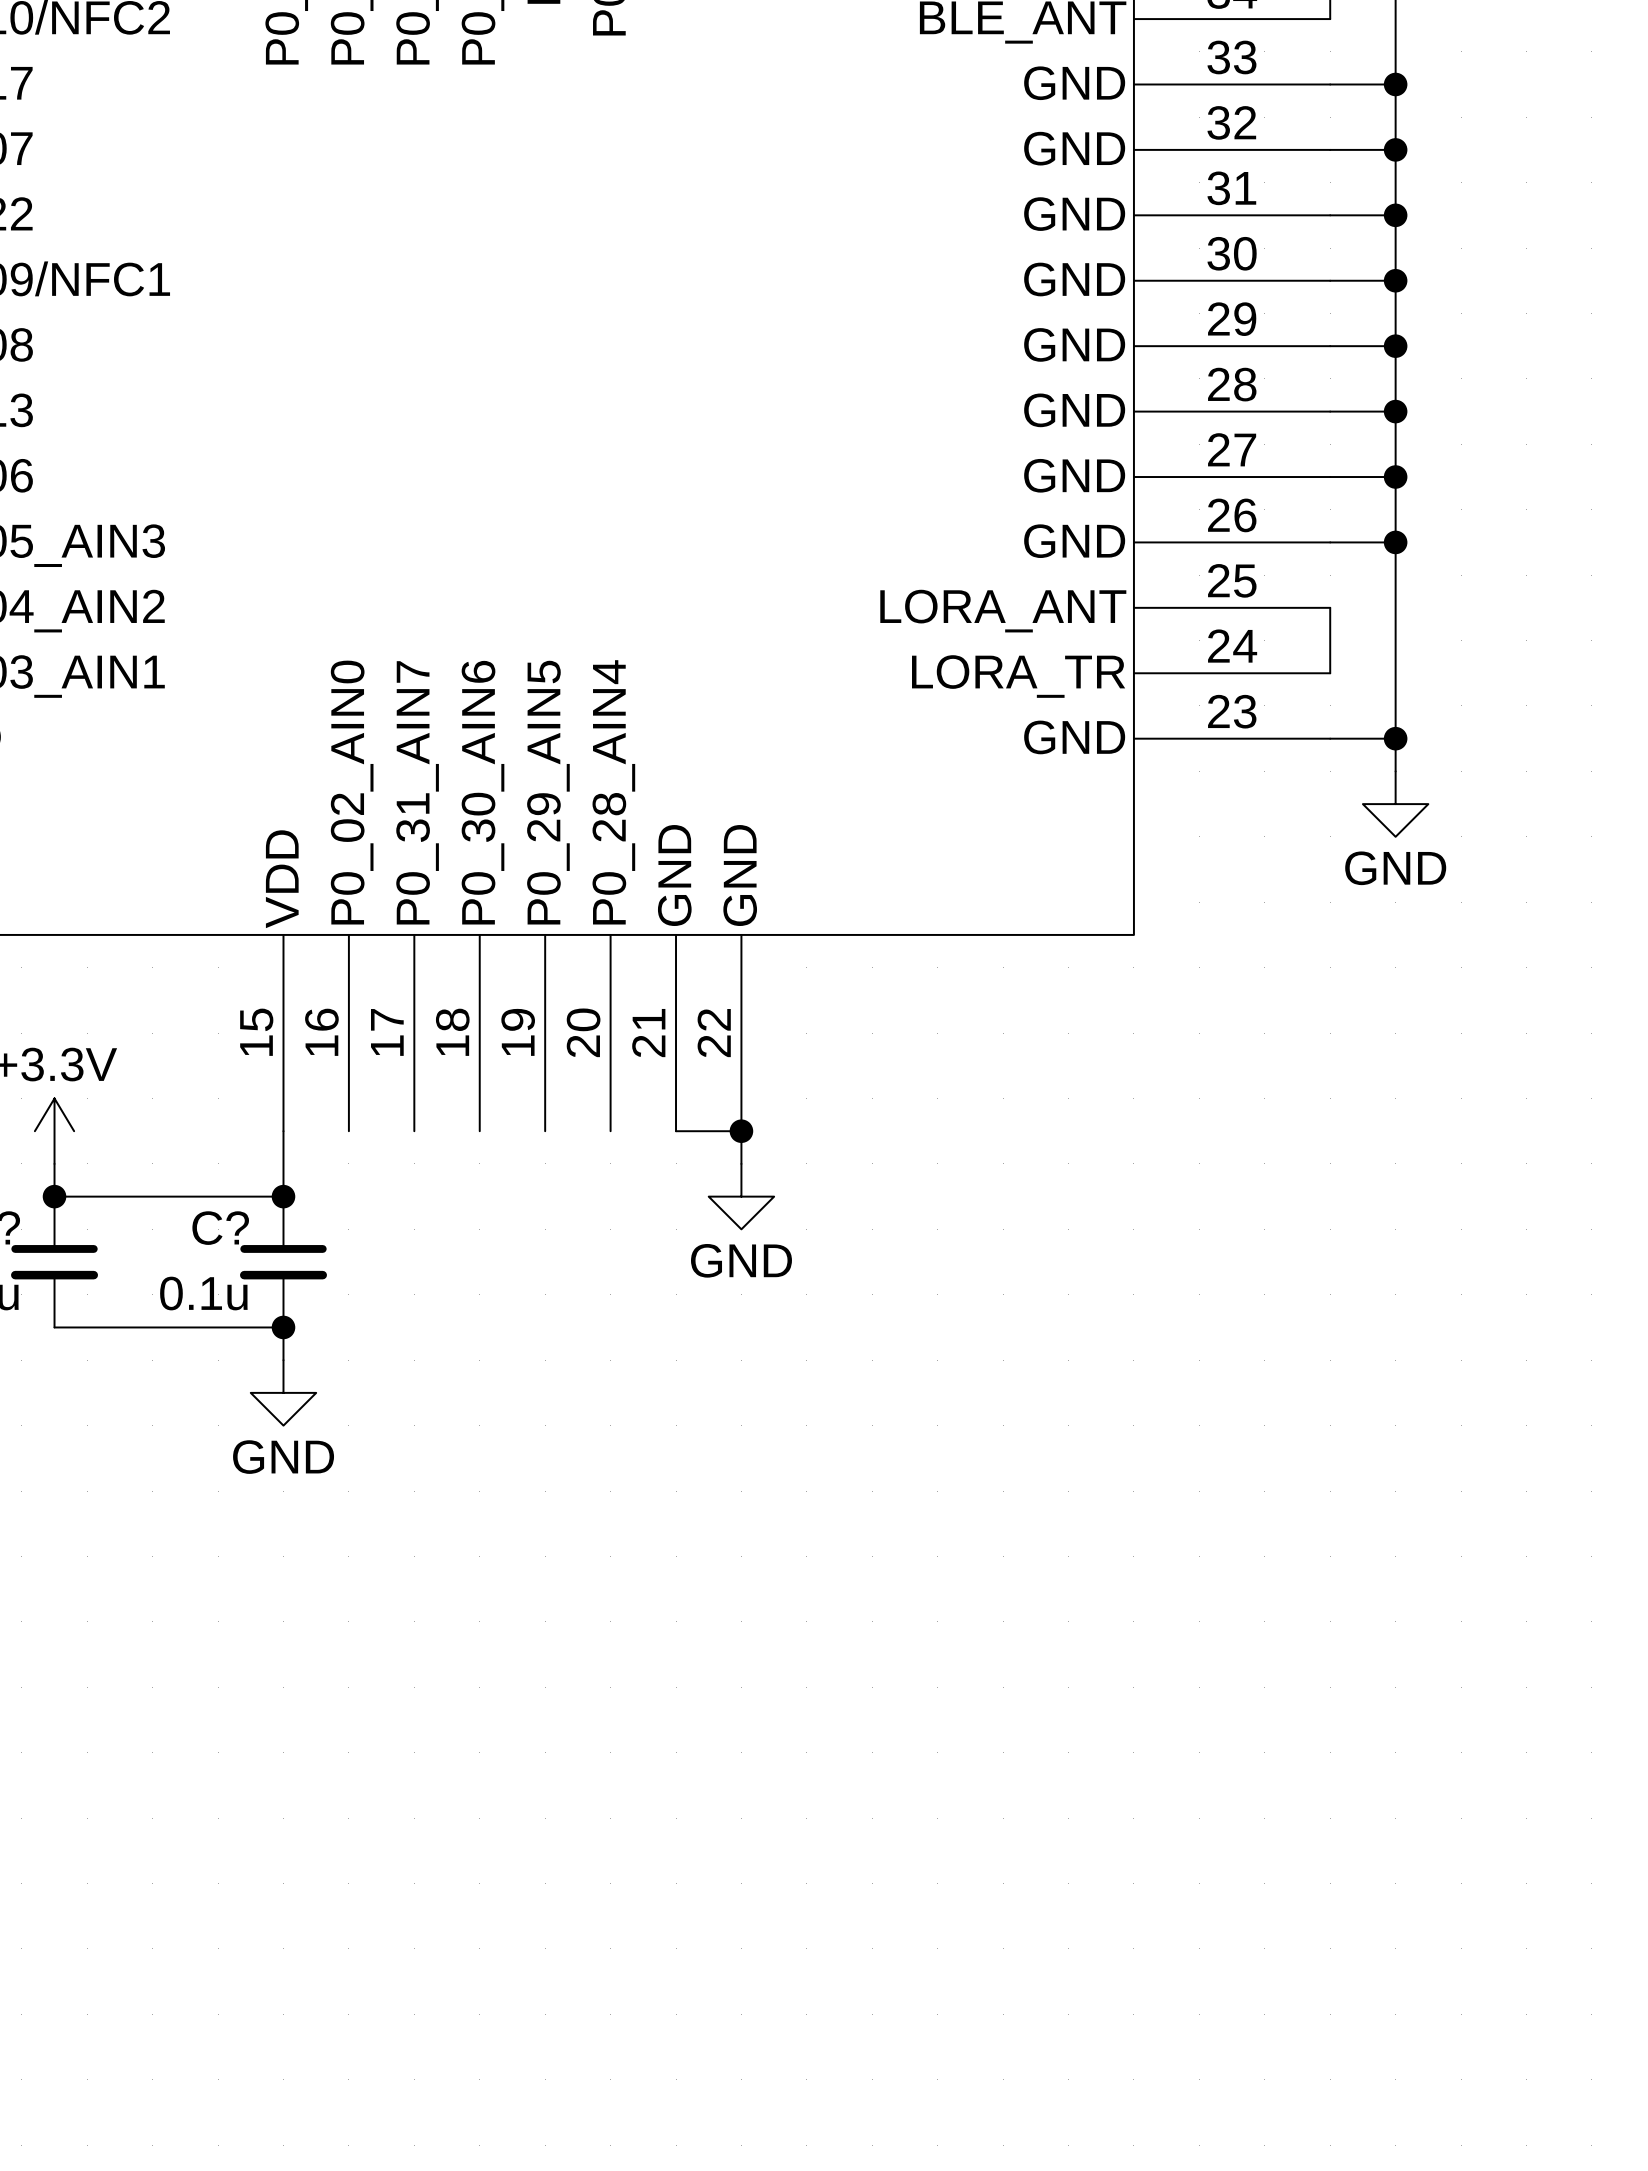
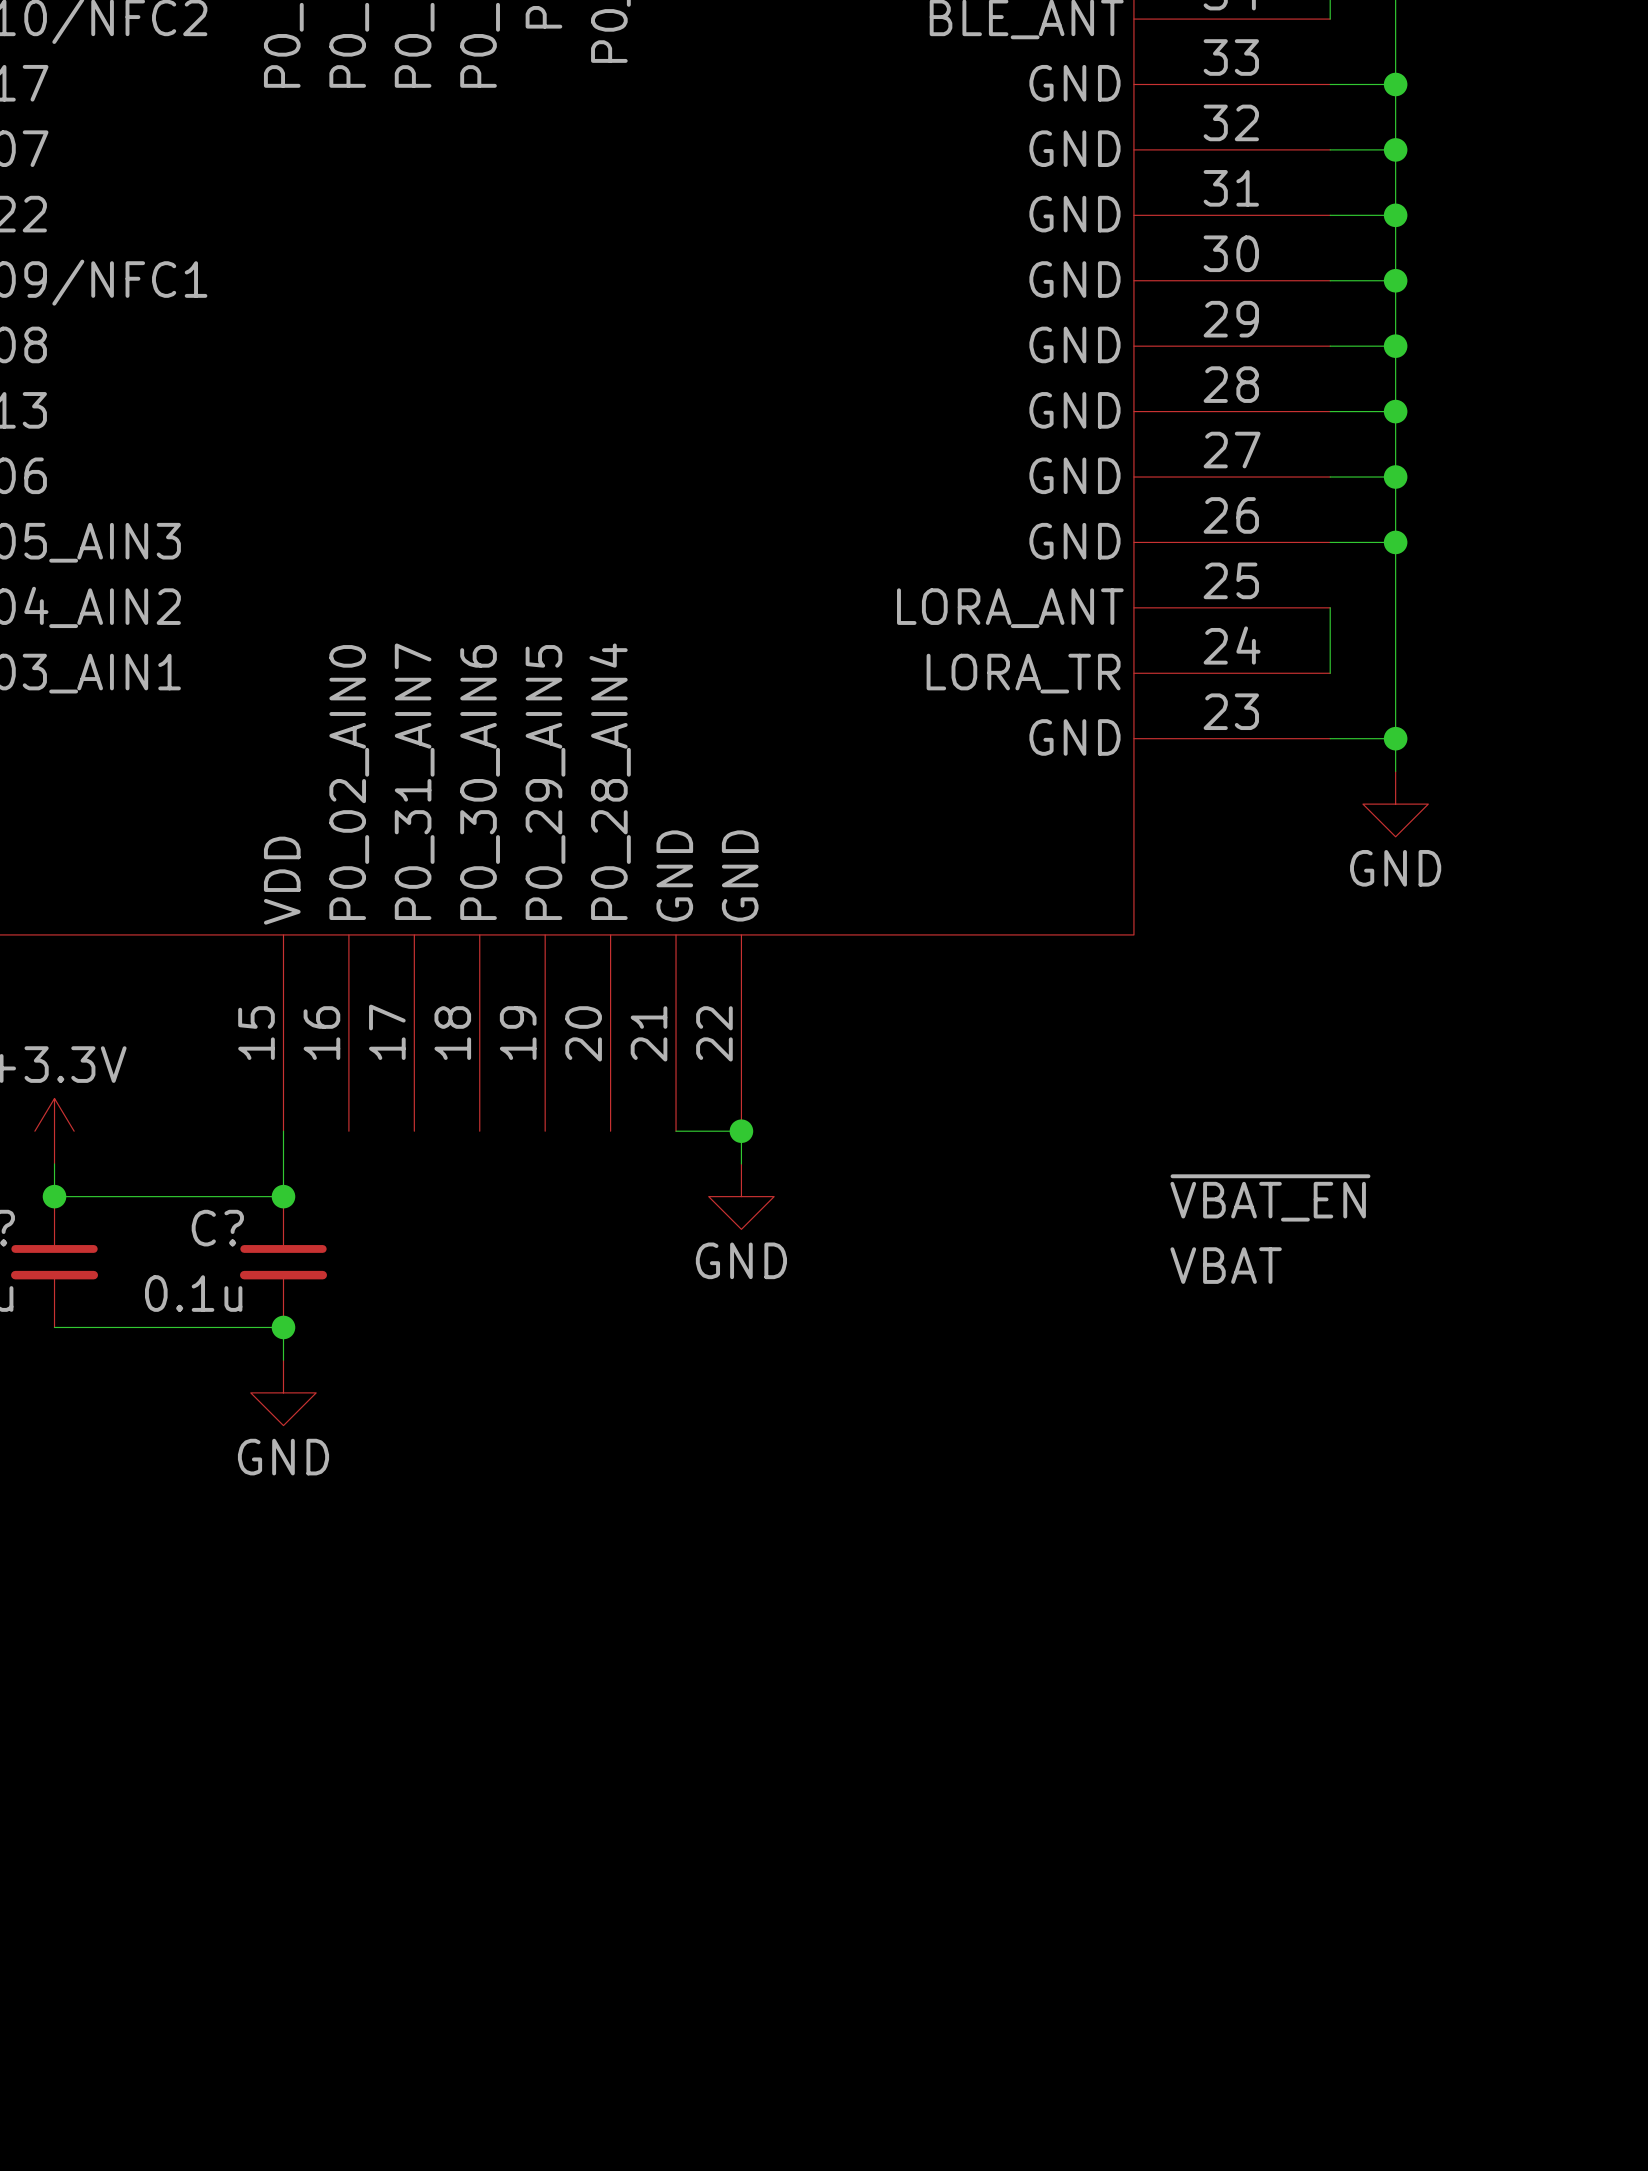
label: none -> ~{VBAT_EN} (1270, 1197)
label: none -> VBAT (1226, 1265)

